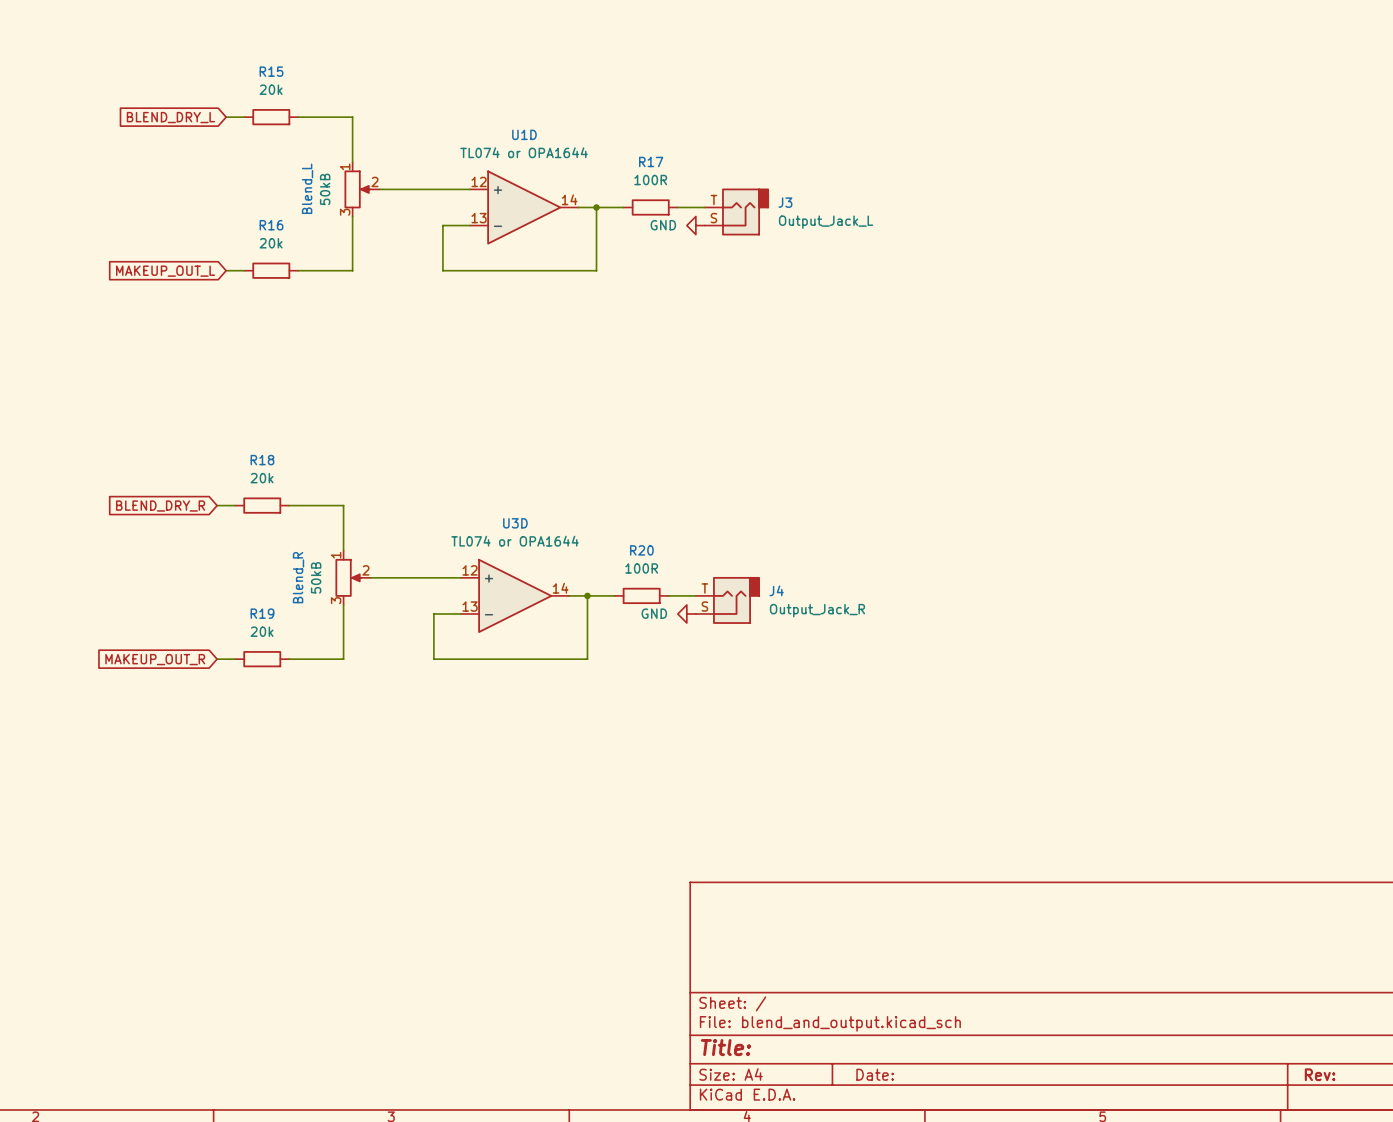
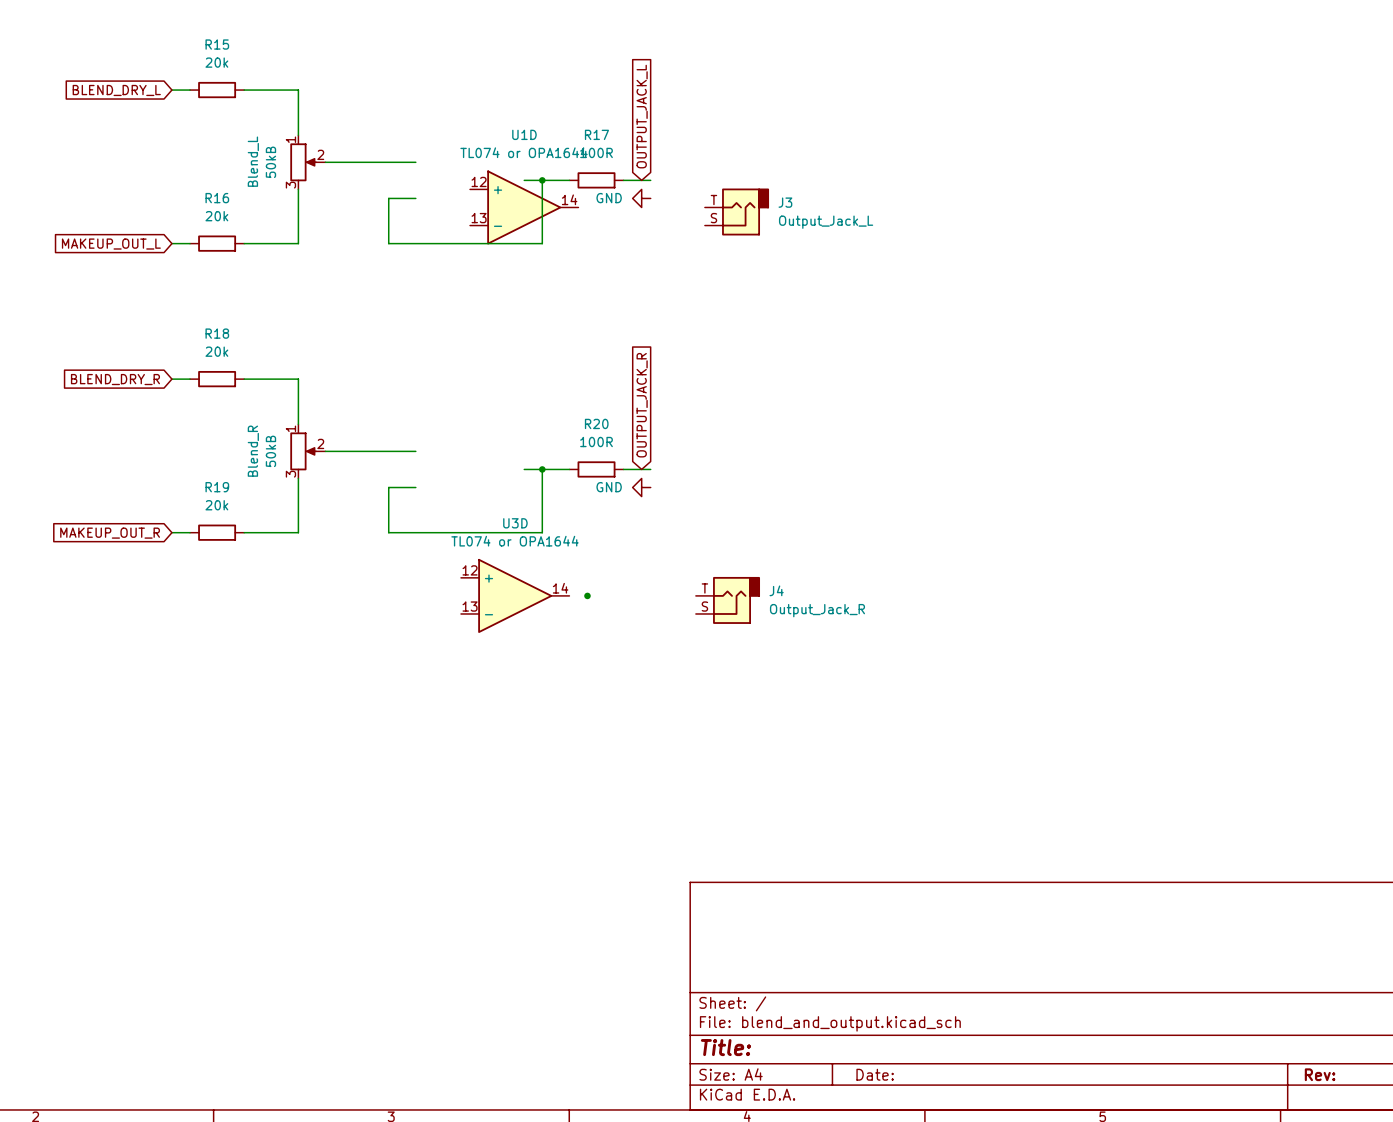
global label: none -> OUTPUT_JACK_L (642, 116)
global label position: BLEND_DRY_L (170, 117) -> BLEND_DRY_L (116, 90)
wire: (226, 117) (244, 117) -> (171, 90) (190, 90)
R15 position: (271, 117) -> (217, 90)
wire: (298, 117) (352, 117) (352, 162) -> (244, 90) (298, 90) (298, 135)
junction: none -> (542, 180)
Blend_L position: (362, 189) -> (307, 162)
wire: (379, 189) (470, 189) -> (325, 162) (415, 162)
wire: (578, 207) (623, 207) -> (524, 180) (569, 180)
wire: (596, 207) (596, 270) (442, 270) (442, 225) (470, 225) -> (542, 180) (542, 243) (388, 243) (388, 198) (415, 198)
junction: (596, 207) -> none
R17 position: (650, 207) -> (596, 180)
wire: (677, 207) (704, 207) -> (623, 180) (650, 180)
wire: (352, 216) (352, 270) (298, 270) -> (298, 189) (298, 243) (244, 243)
power symbol position: GND (695, 225) -> GND (641, 198)
wire: (226, 270) (244, 270) -> (171, 243) (190, 243)
R16 position: (271, 270) -> (217, 243)
global label position: MAKEUP_OUT_L (165, 271) -> MAKEUP_OUT_L (111, 244)
global label: none -> OUTPUT_JACK_R (642, 405)
junction: none -> (542, 469)
power symbol: none -> GND (641, 487)
wire: (217, 505) (235, 505) -> (171, 379) (190, 379)
R18 position: (262, 505) -> (217, 379)
wire: (289, 505) (343, 505) (343, 550) -> (244, 379) (298, 379) (298, 424)
global label position: BLEND_DRY_R (160, 506) -> BLEND_DRY_R (115, 379)
Blend_R position: (353, 577) -> (307, 451)
wire: (370, 577) (461, 577) -> (325, 451) (415, 451)
wire: (569, 595) (614, 595) -> (524, 469) (569, 469)
wire: (587, 595) (587, 659) (433, 659) (433, 613) (461, 613) -> (542, 469) (542, 532) (388, 532) (388, 487) (415, 487)
R20 position: (641, 595) -> (596, 469)
wire: (668, 595) (695, 595) -> (623, 469) (650, 469)
wire: (343, 604) (343, 659) (289, 659) -> (298, 478) (298, 532) (244, 532)
power symbol: GND (686, 613) -> none
global label position: MAKEUP_OUT_R (155, 659) -> MAKEUP_OUT_R (110, 533)
wire: (217, 659) (235, 659) -> (171, 532) (190, 532)
R19 position: (262, 659) -> (217, 532)

